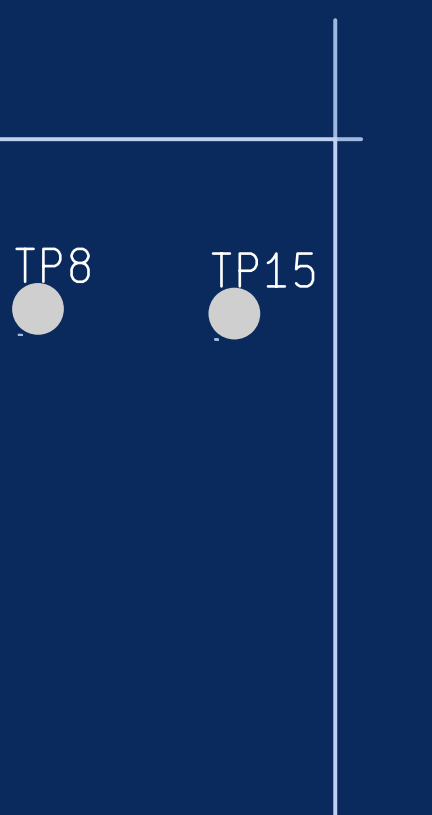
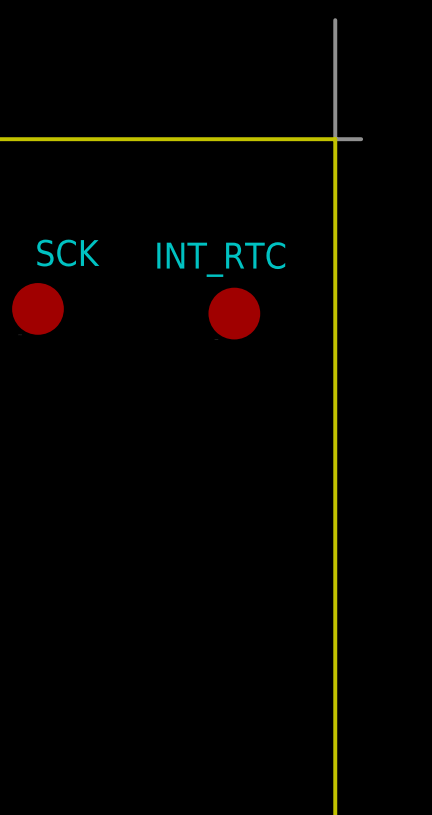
text: none -> SCK (68, 253)
text: none -> INT_RTC (221, 259)
TP8 name: TP8 (52, 265) -> none
TP15 name: TP15 (263, 269) -> none

